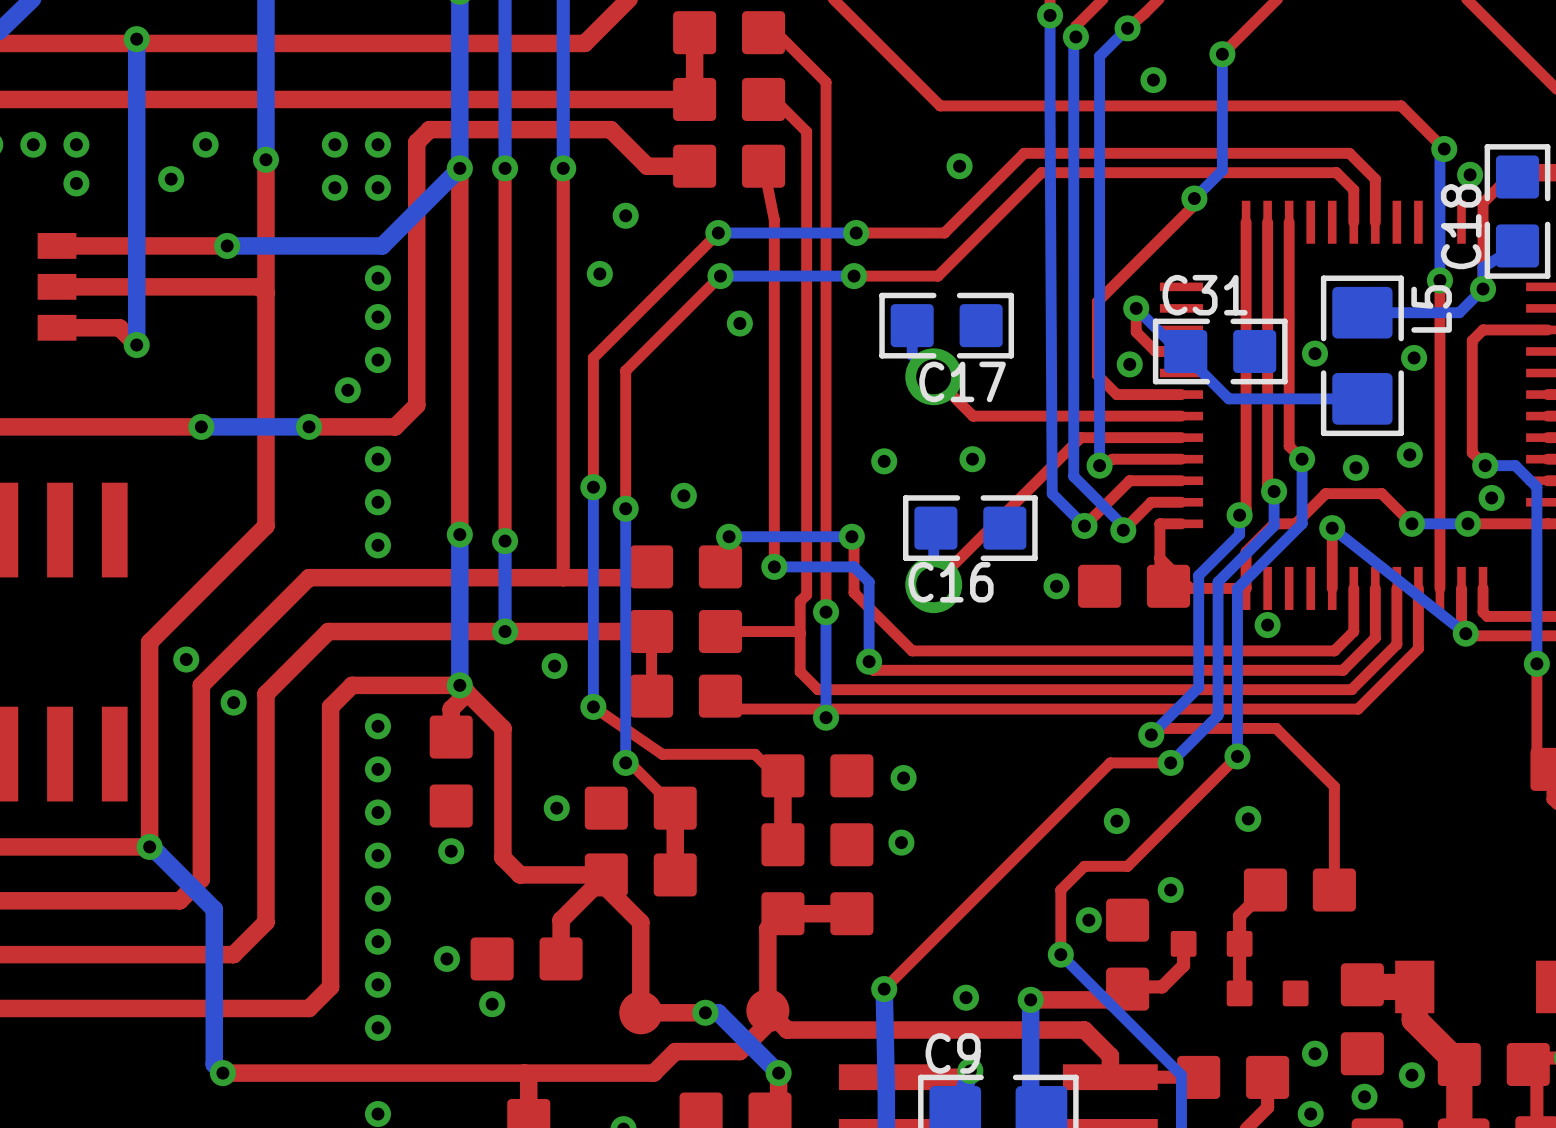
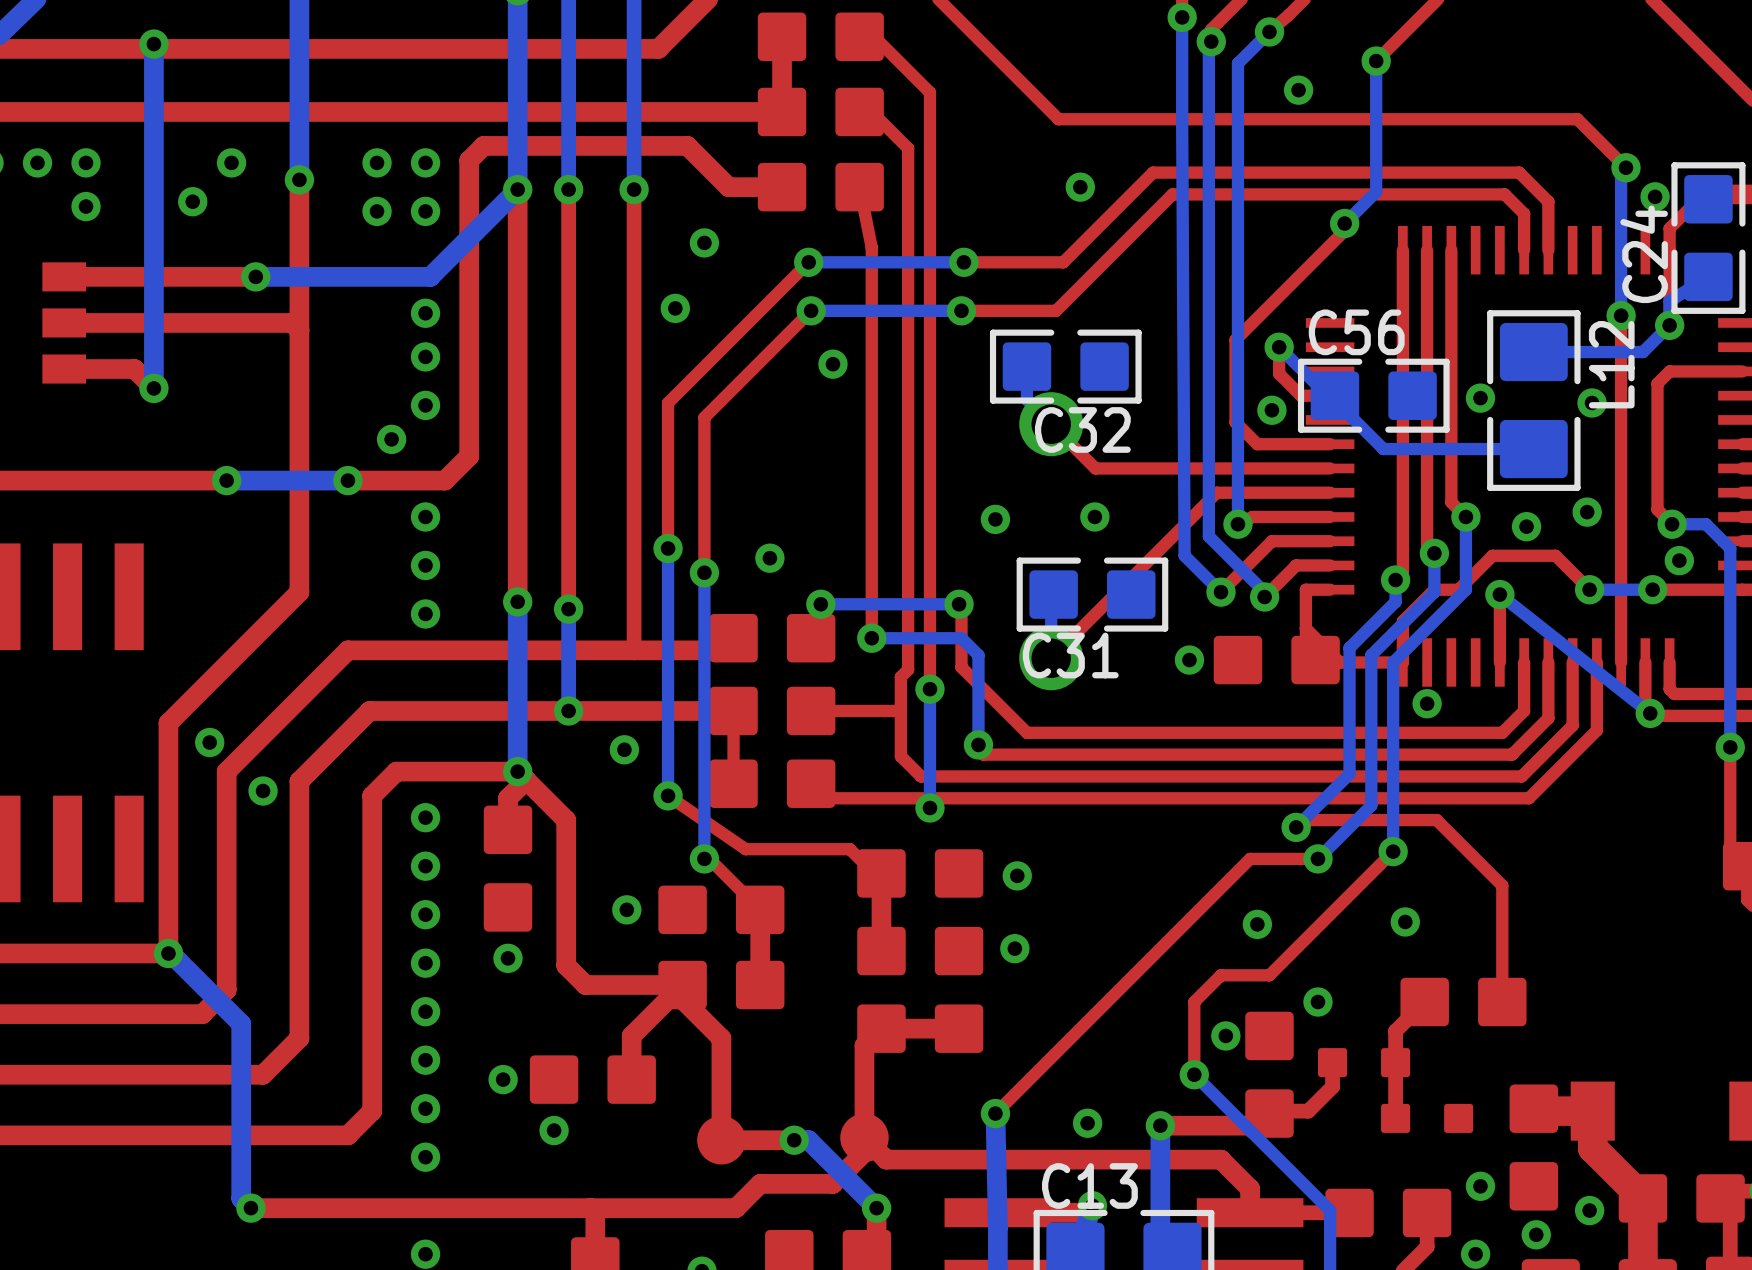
C18 name: C18 (1461, 226) -> C24 (1644, 254)
C31 name: C31 (1205, 295) -> C56 (1356, 332)
L5 name: L5 (1431, 308) -> L12 (1611, 364)
C17 name: C17 (962, 381) -> C32 (1082, 429)
C16 name: C16 (951, 582) -> C31 (1070, 655)
C9 name: C9 (953, 1053) -> C13 (1089, 1186)

